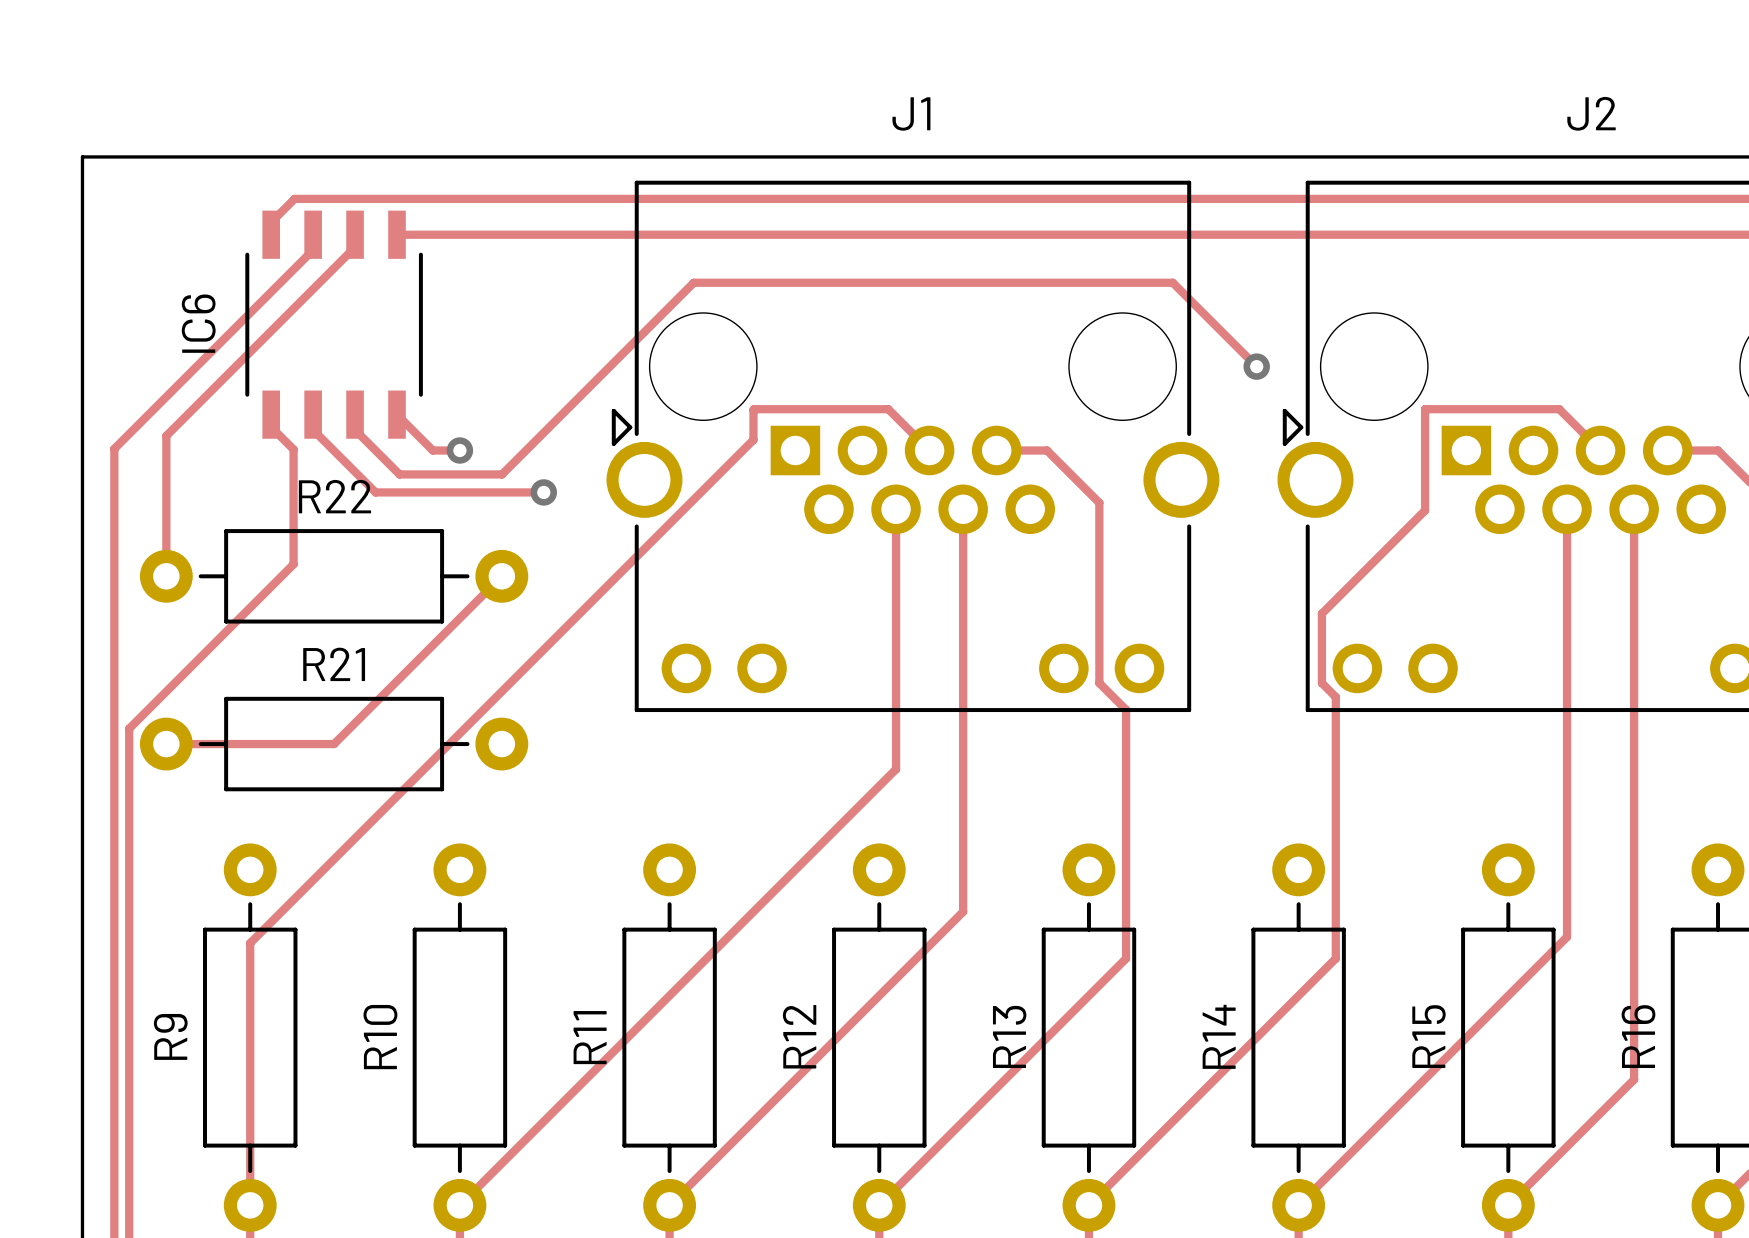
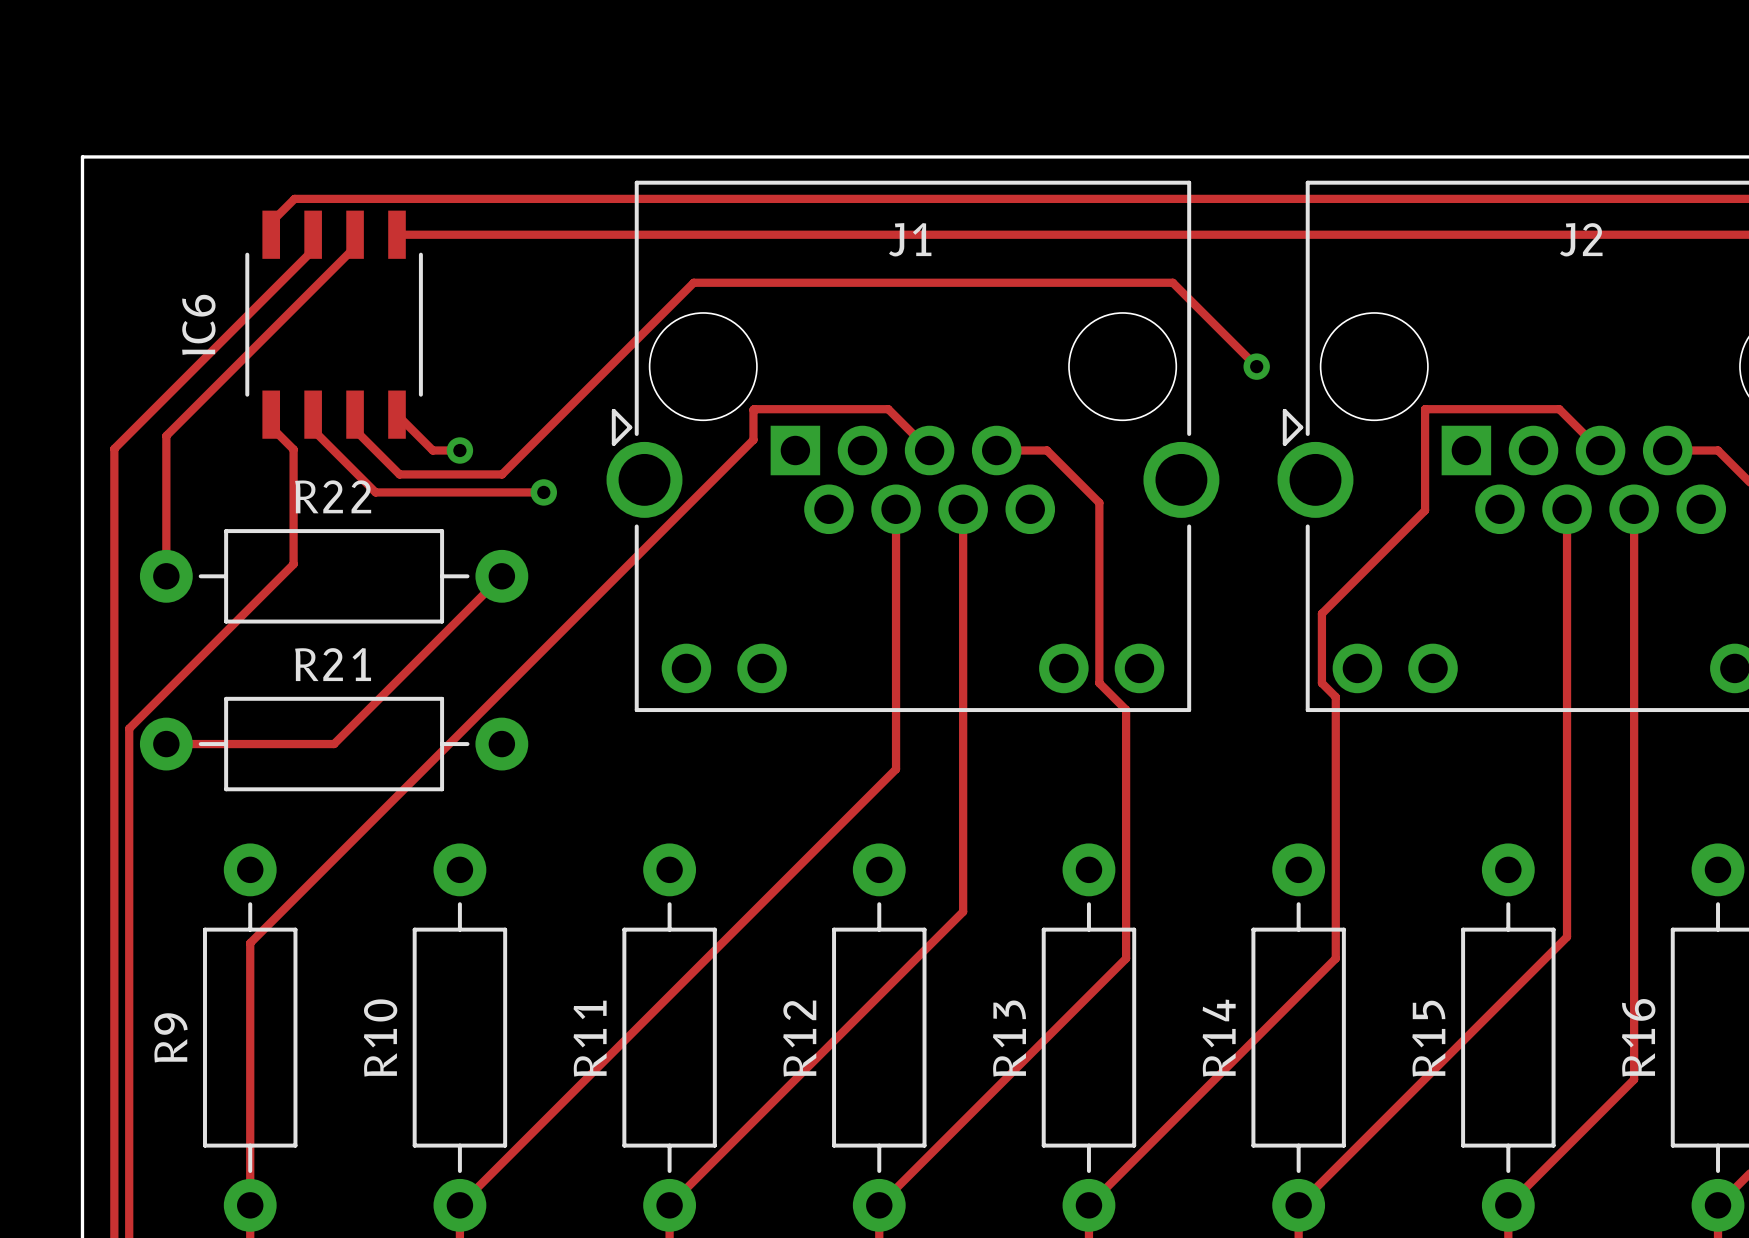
J1 name position: J1 (911, 113) -> J1 (910, 239)
J2 name position: J2 (1591, 113) -> J2 (1581, 239)

